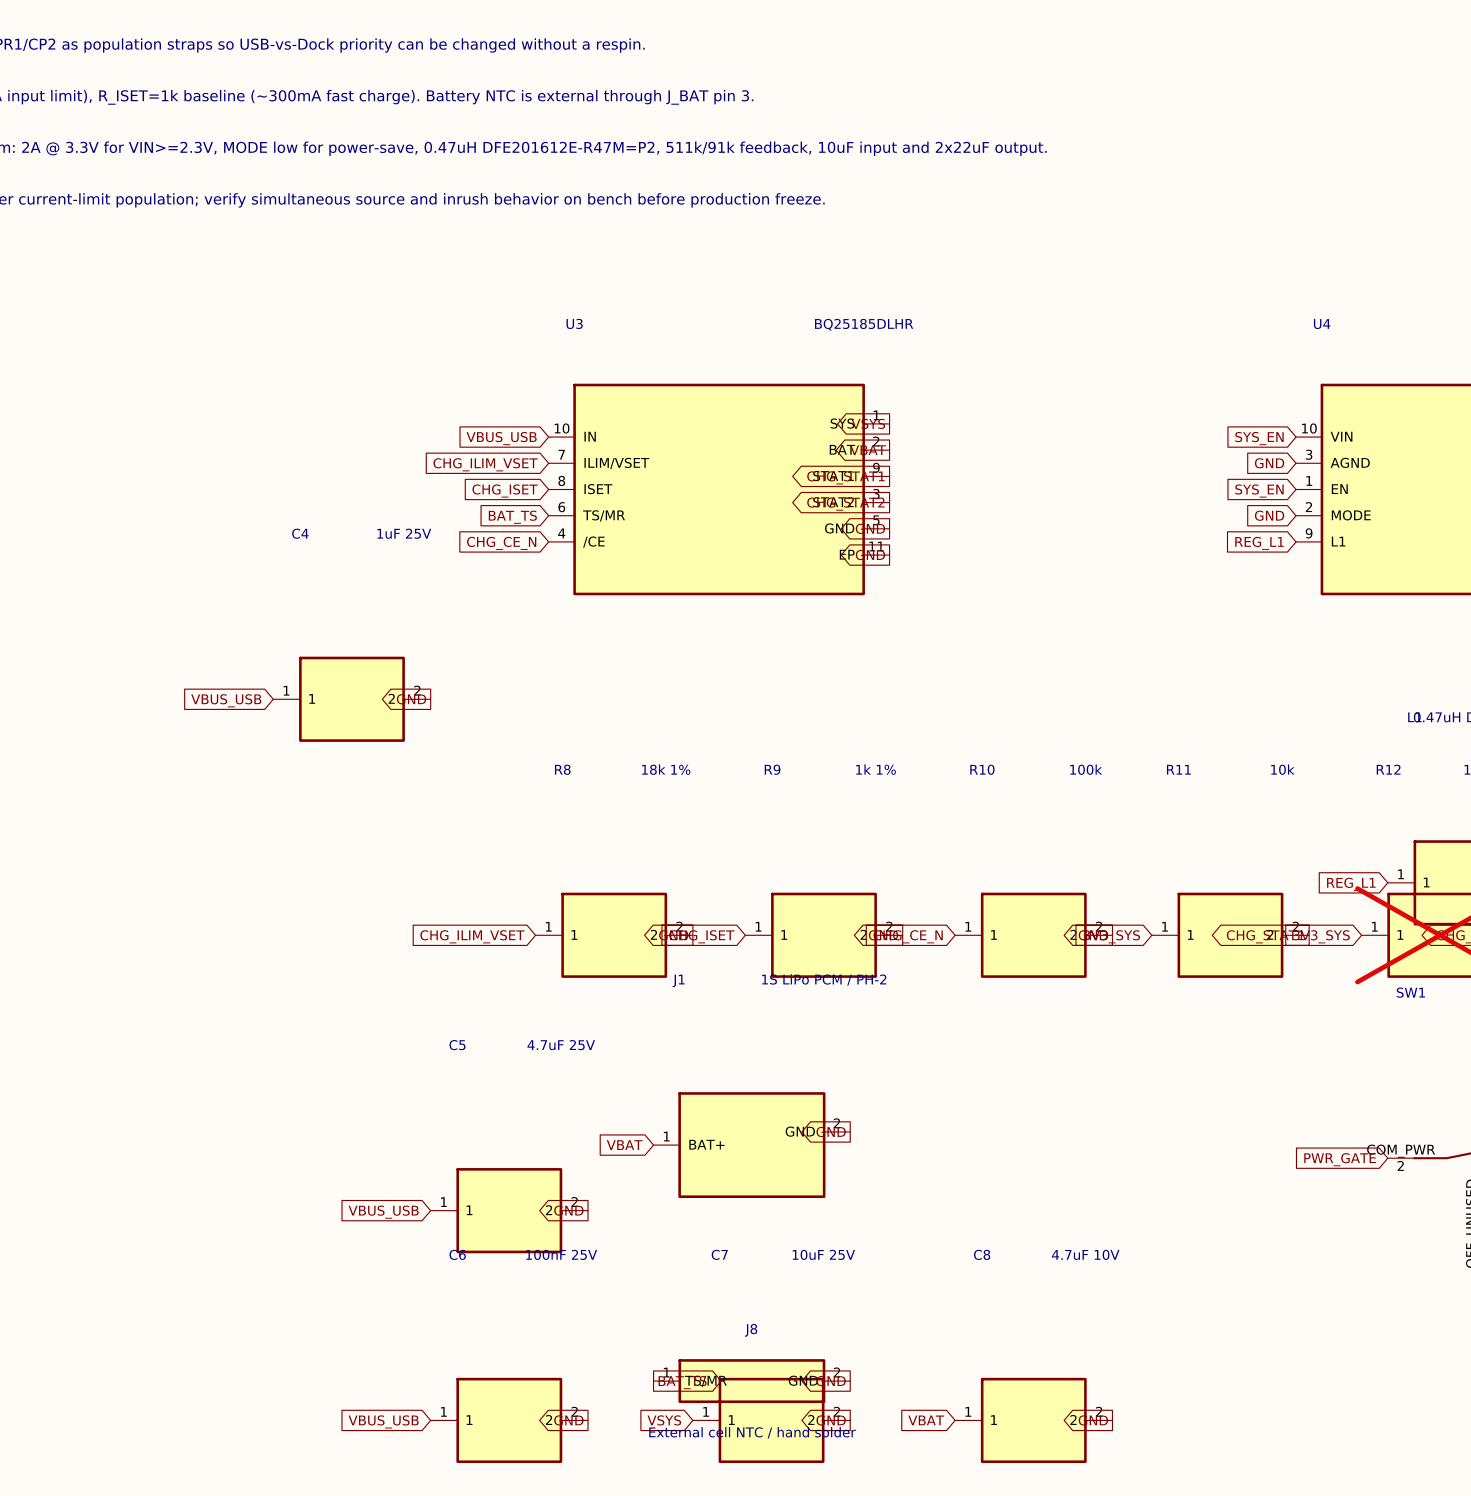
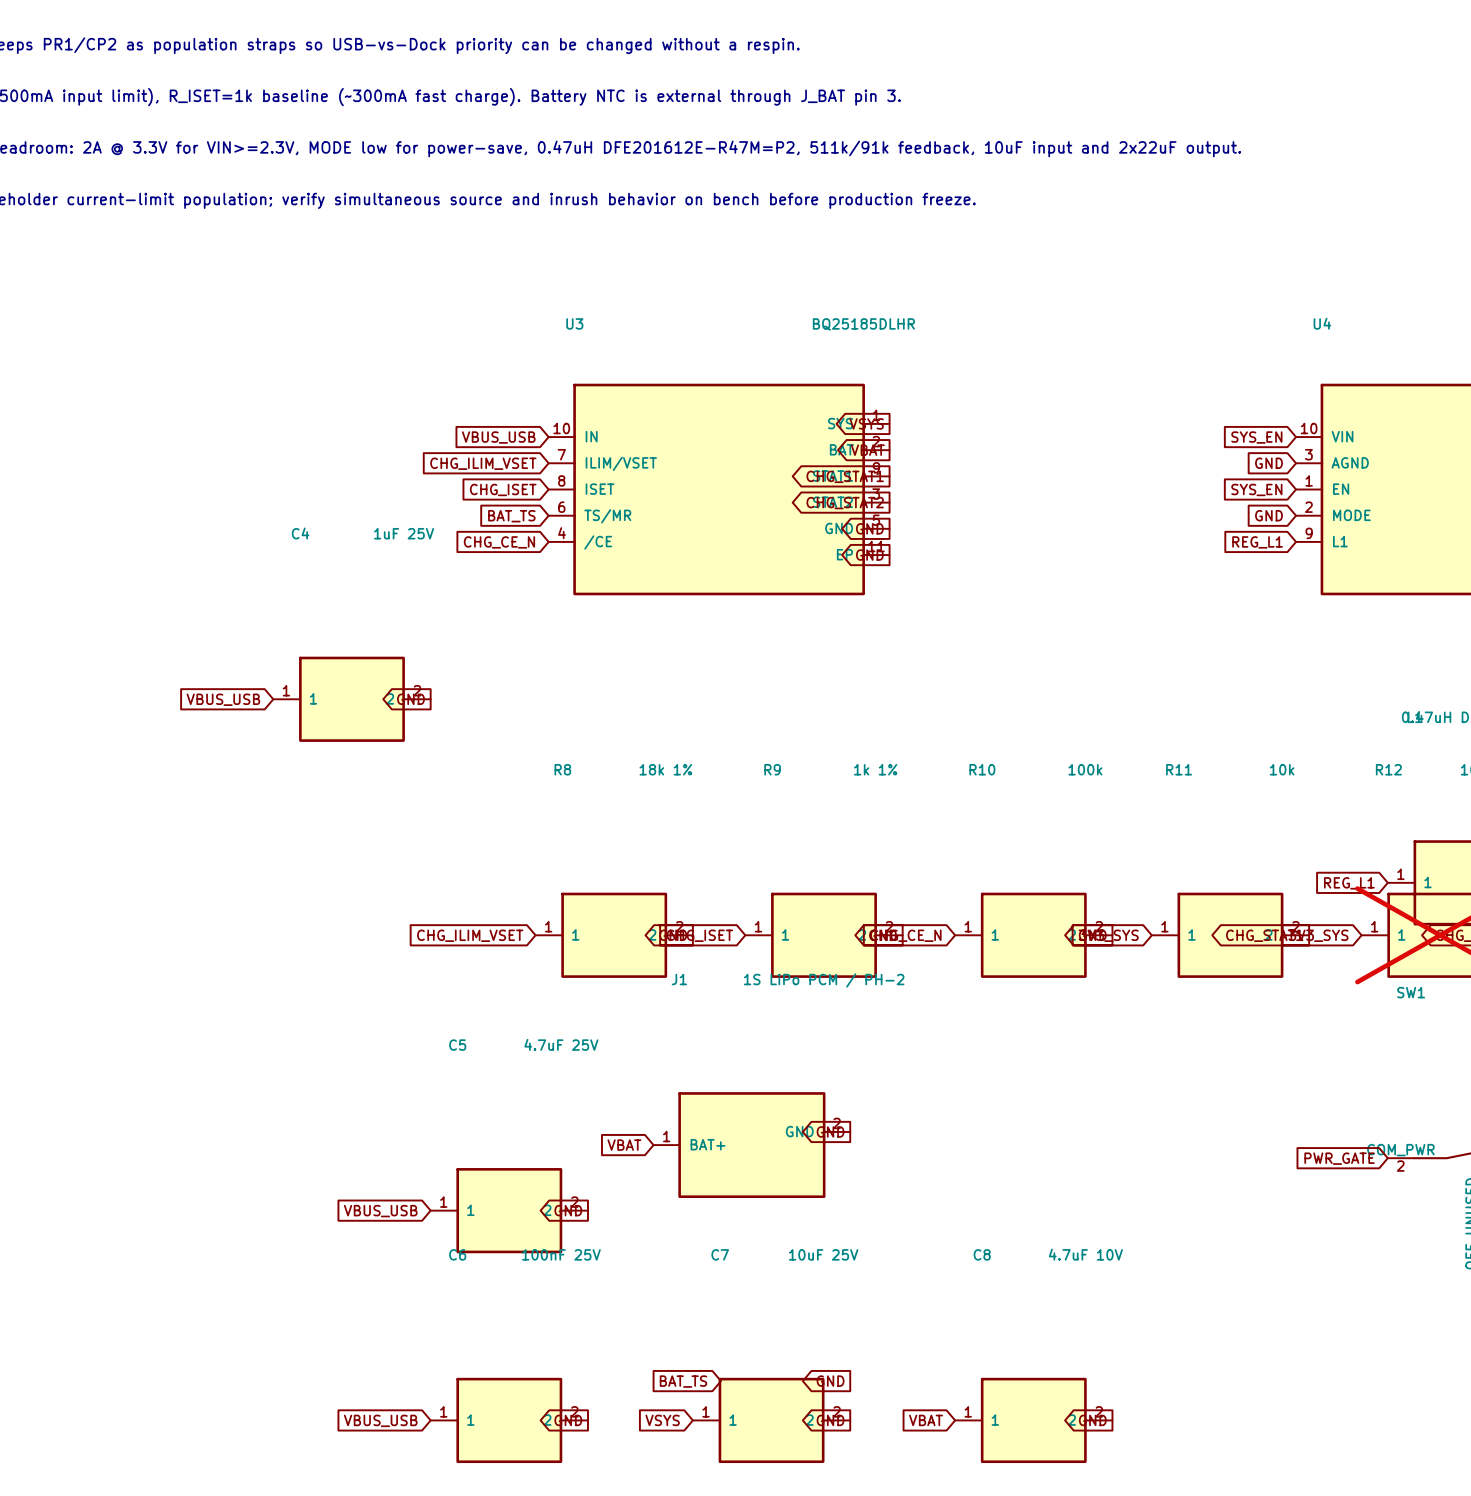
J8: External cell NTC / hand solder (751, 1381) -> none

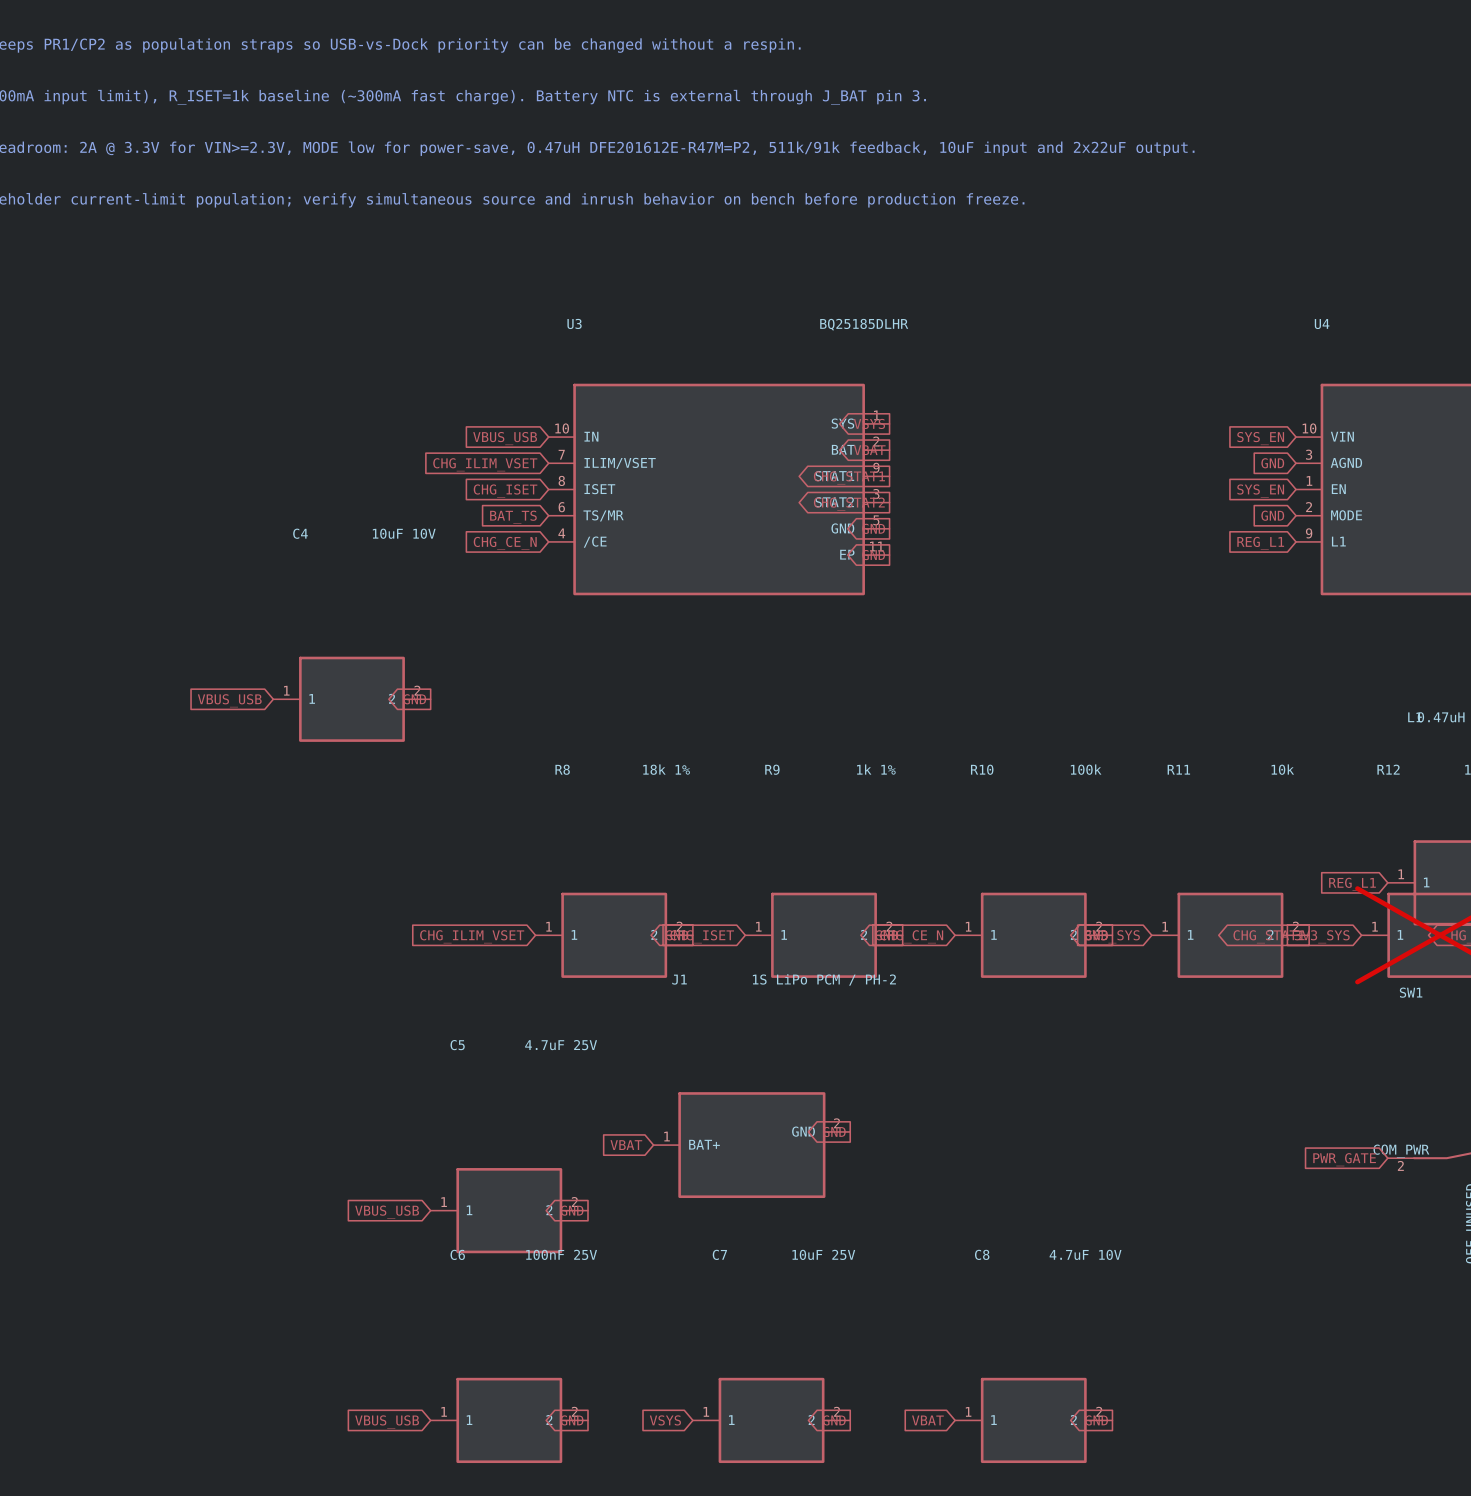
C4 value: 1uF 25V (404, 533) -> 10uF 10V (404, 533)
global label: BAT_TS (683, 1381) -> none
global label: GND (830, 1381) -> none

